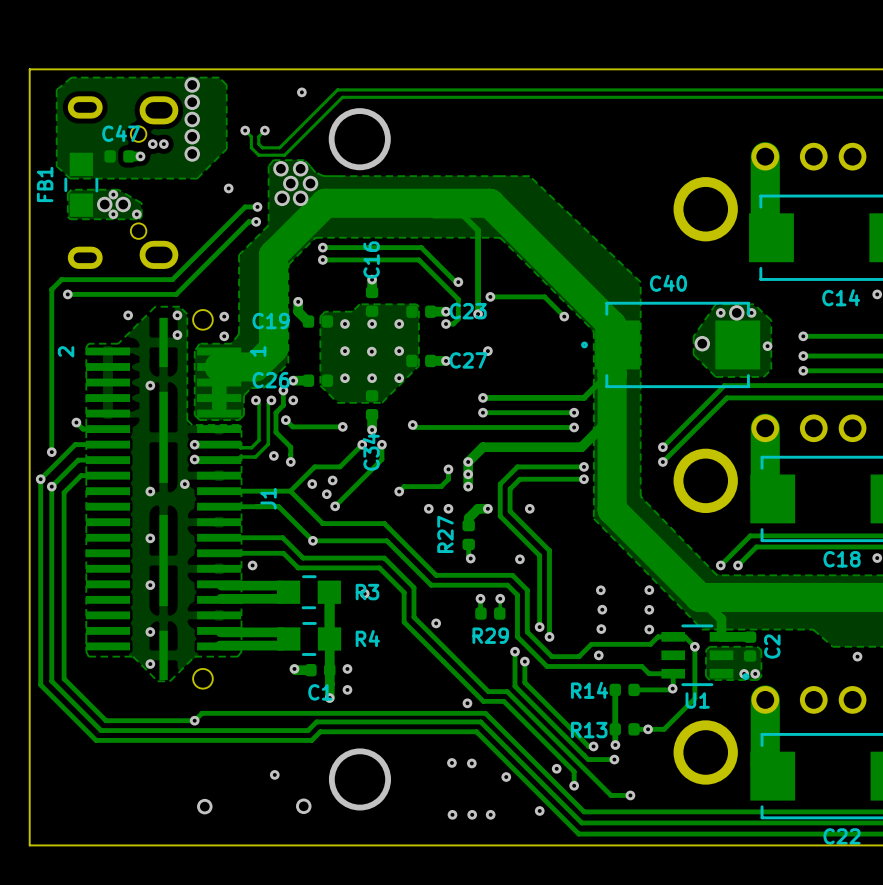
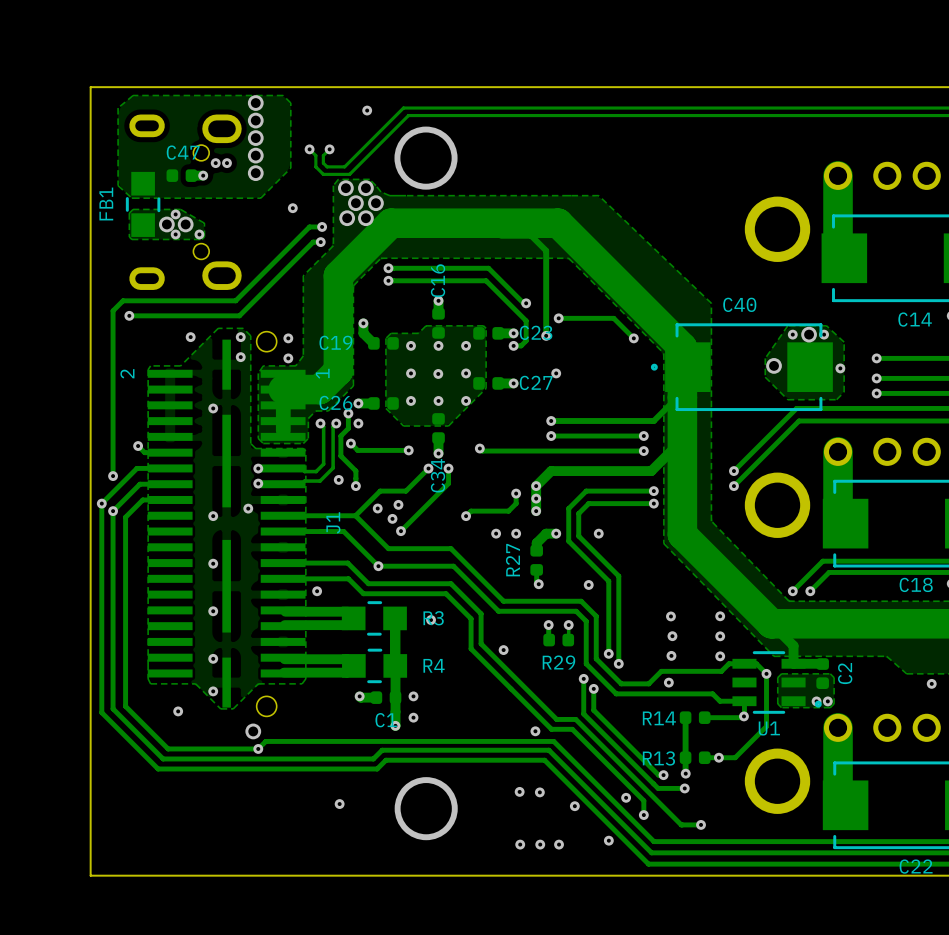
via: none -> (178, 711)
via: none -> (253, 731)
via: (204, 806) -> none
via: (303, 806) -> none

